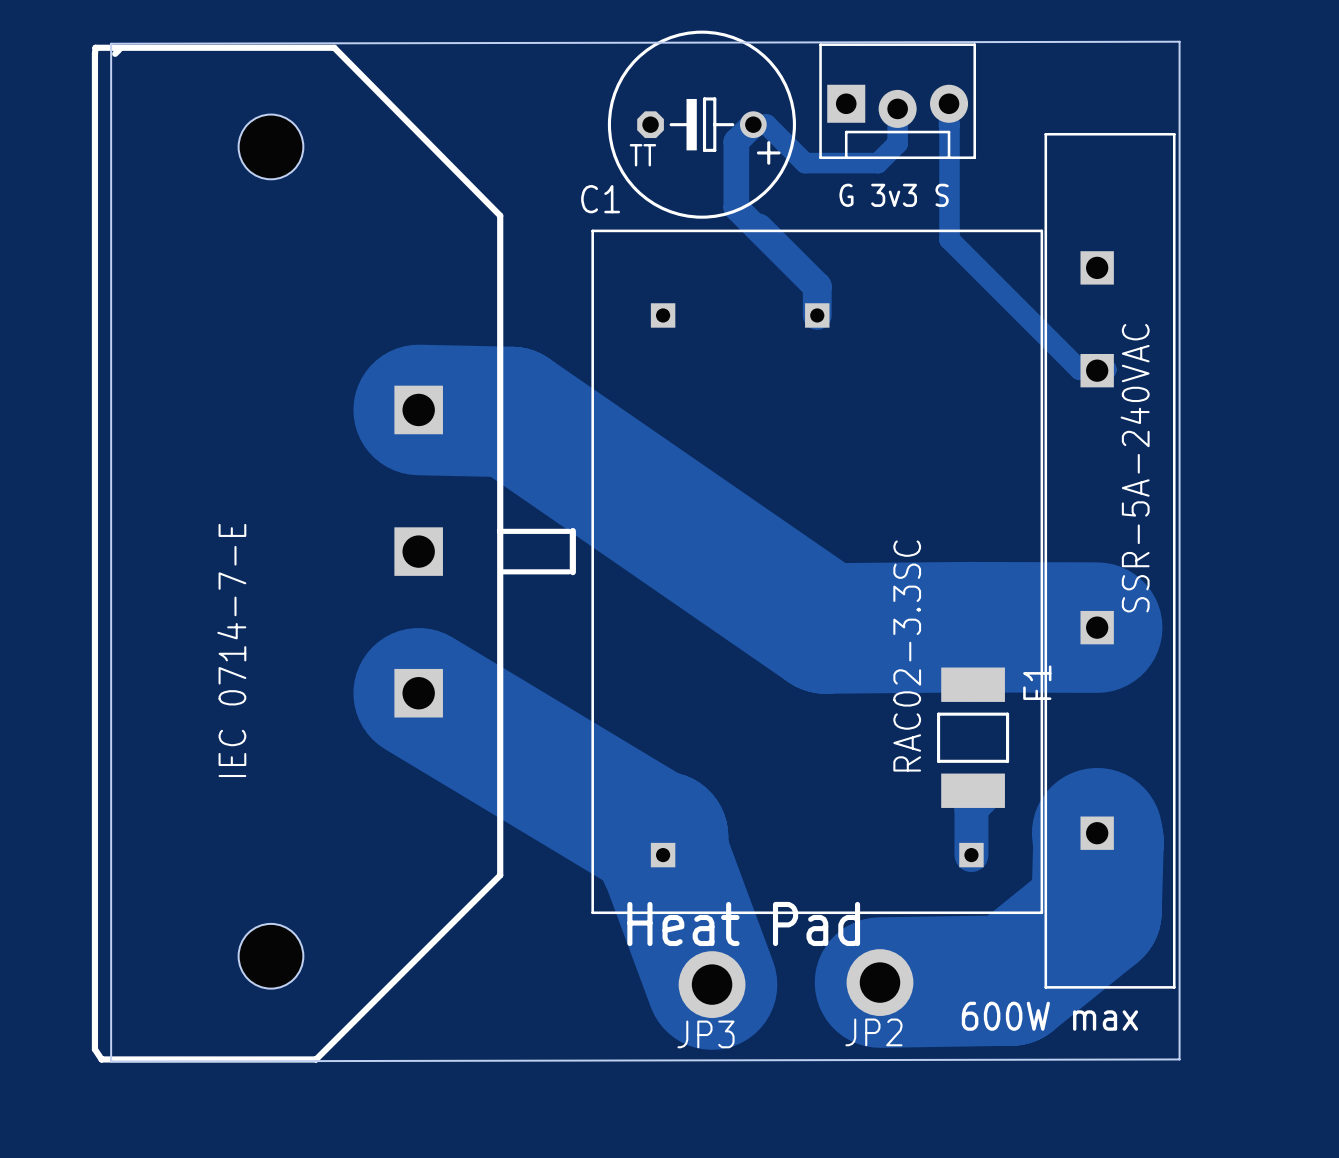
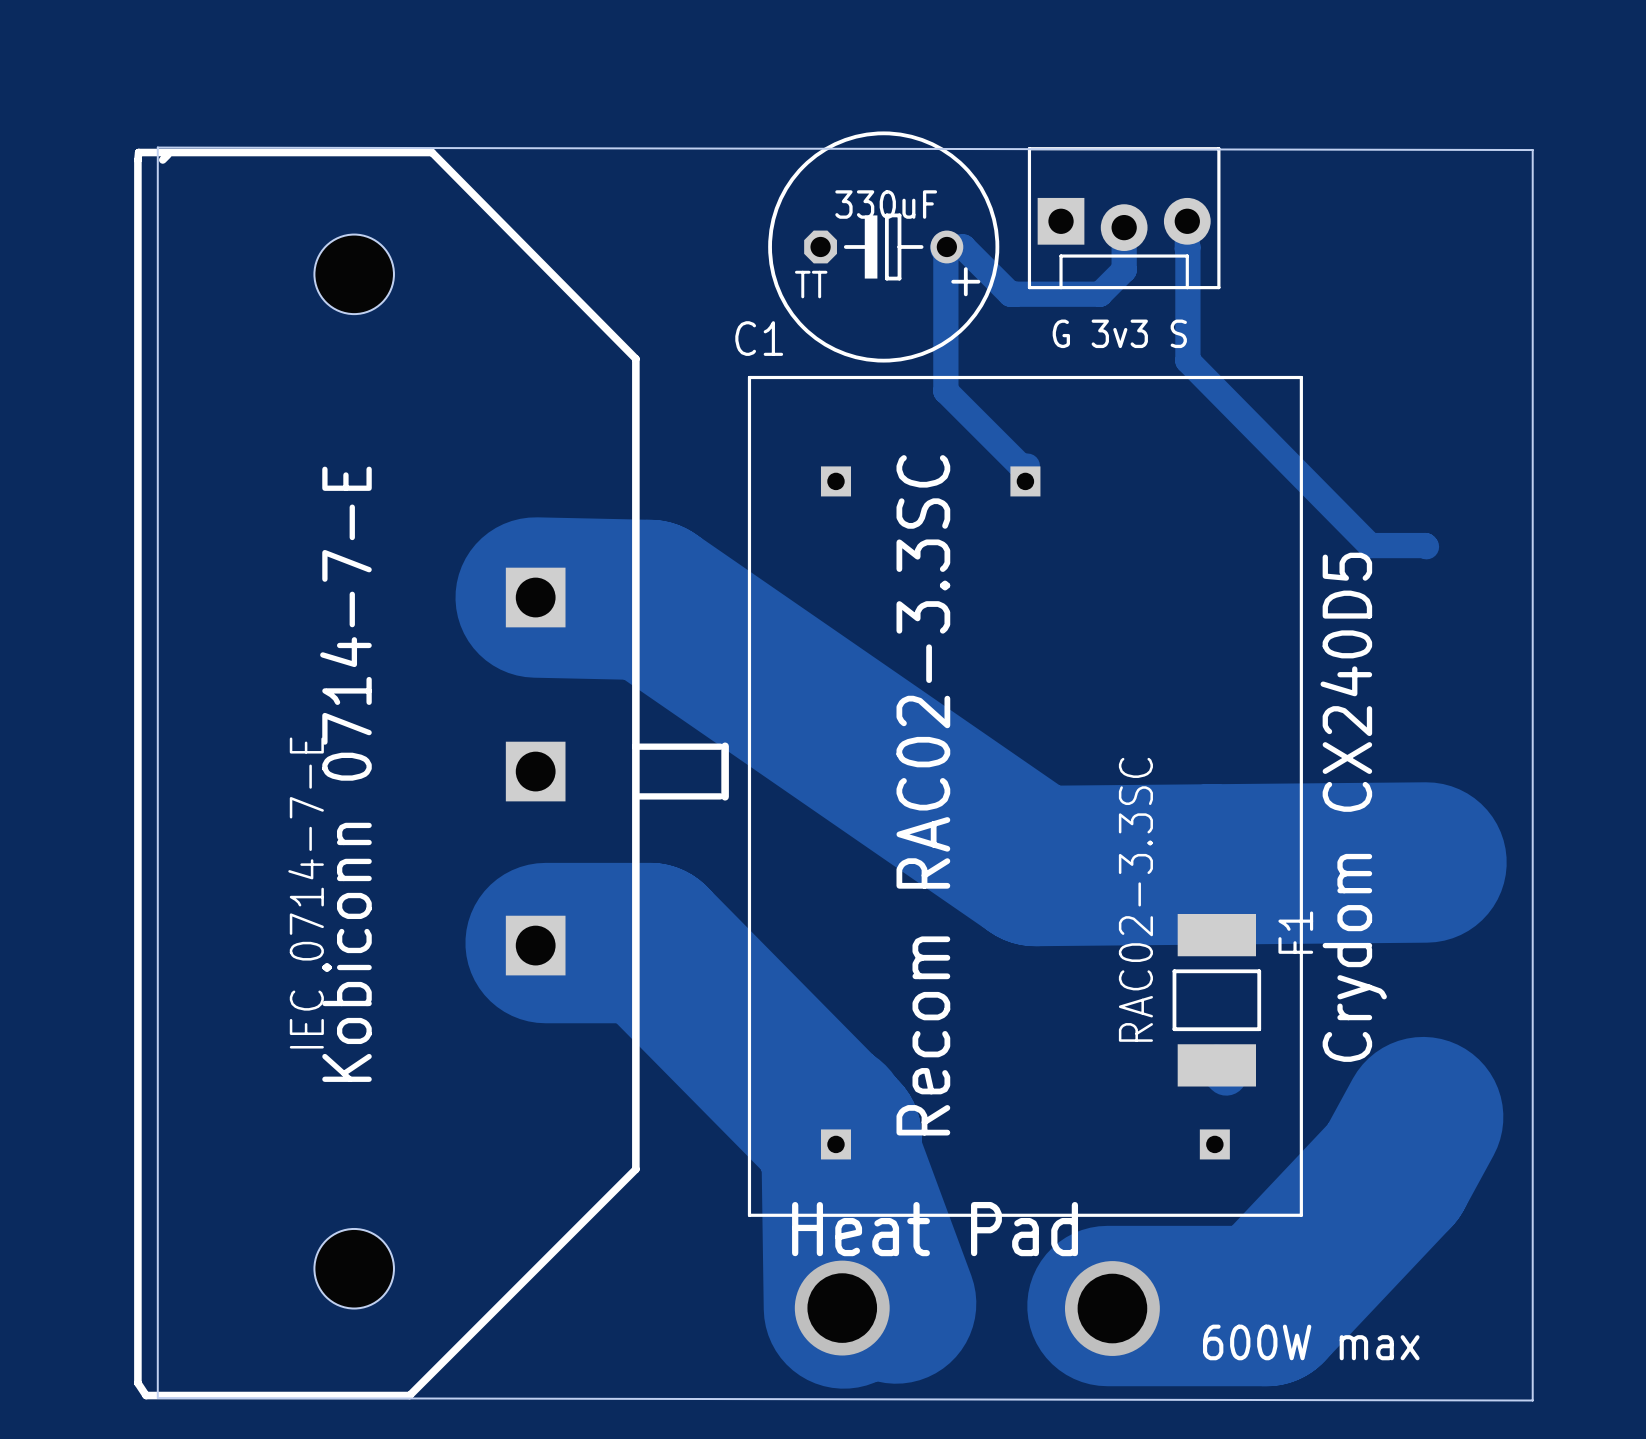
board edge: (111, 43) (1179, 41) (1179, 1059) (111, 1061) -> (157, 147) (1532, 150) (1532, 1400) (157, 1398)
text: none -> 330uF (886, 204)
track: none -> (946, 246) (945, 391) (1020, 466) (1027, 466)
track: (752, 125) (736, 141) (736, 207) (817, 286) (817, 315) -> none
track: (949, 217) (949, 239) (1079, 369) (1106, 369) (1097, 370) -> (1187, 360) (1370, 545) (1426, 546)
text: none -> Kobiconn 0714-7-E (345, 774)
part: SSR-5A-240VAC (1110, 560) -> none
text: none -> Recom RAC02-3.3SC (923, 795)
text: none -> Crydom CX240D5 (1353, 807)
track: (968, 627) (1097, 627) -> (1211, 864) (1426, 862)
track: none -> (545, 943) (650, 943) (841, 1136) (843, 1308)
track: (418, 693) (657, 836) (663, 836) (663, 855) -> none
track: (981, 798) (971, 808) (971, 855) -> none
track: none -> (1423, 1117) (1393, 1171) (1266, 1306) (1107, 1306)
track: (1097, 833) (1096, 911) (1011, 980) (879, 982) -> none
JP2: (879, 982) -> none
JP3: (712, 984) -> none
via: none -> (842, 1308)
via: none -> (1112, 1308)

